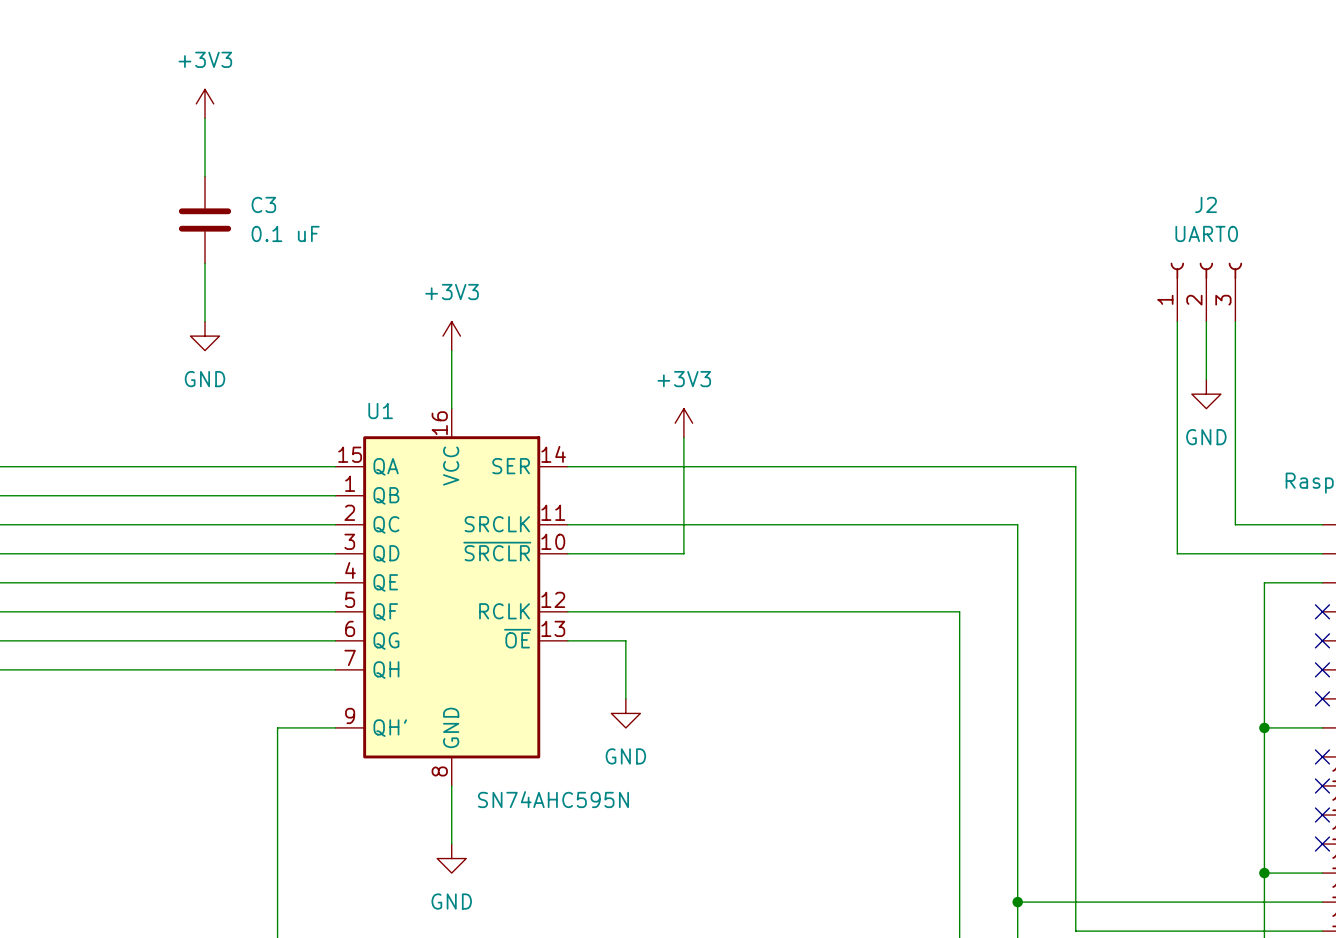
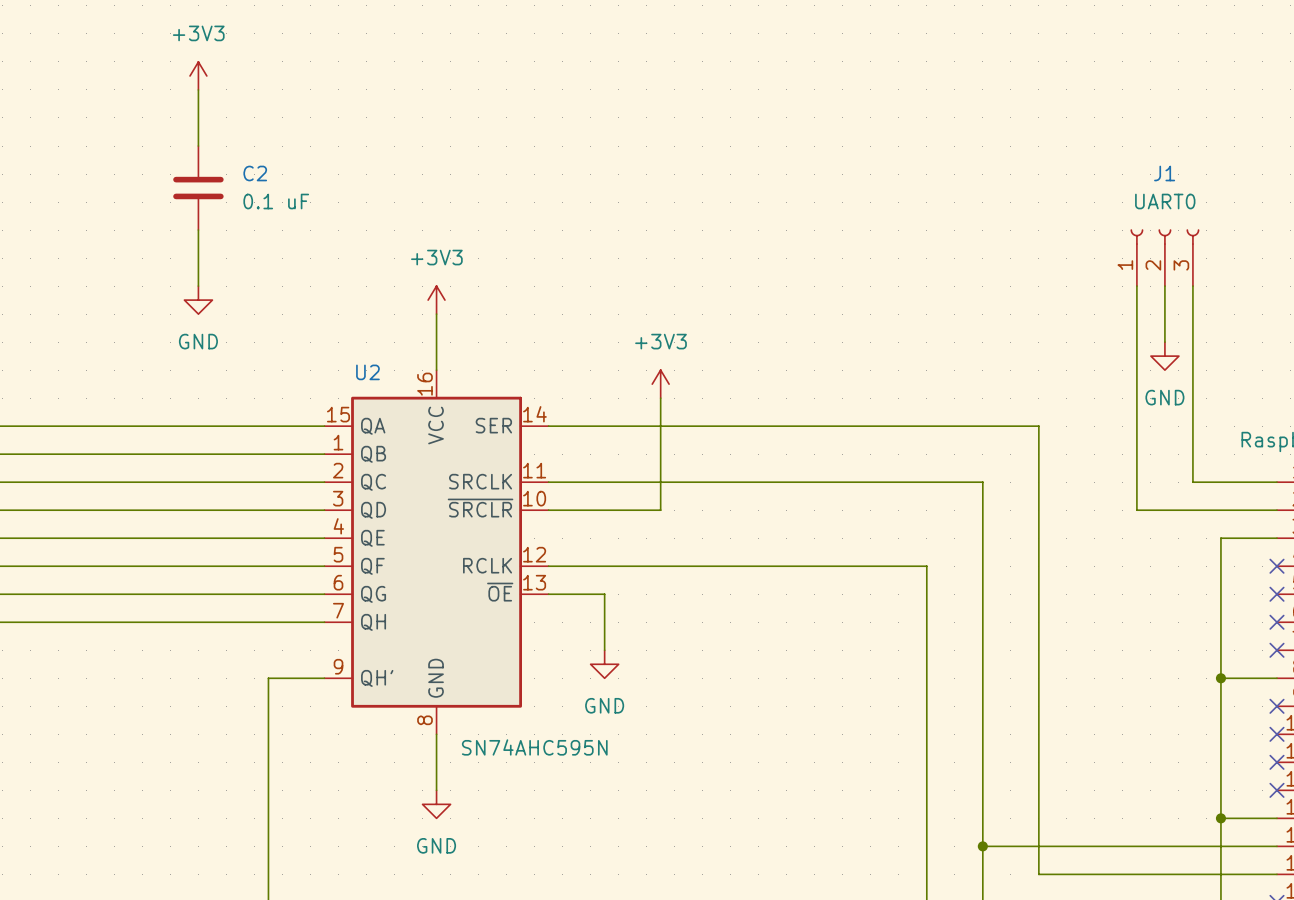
C3 name: C3 (263, 204) -> C2 (255, 173)
J2 name: J2 (1206, 204) -> J1 (1164, 173)
U1 name: U1 (380, 411) -> U2 (367, 372)

